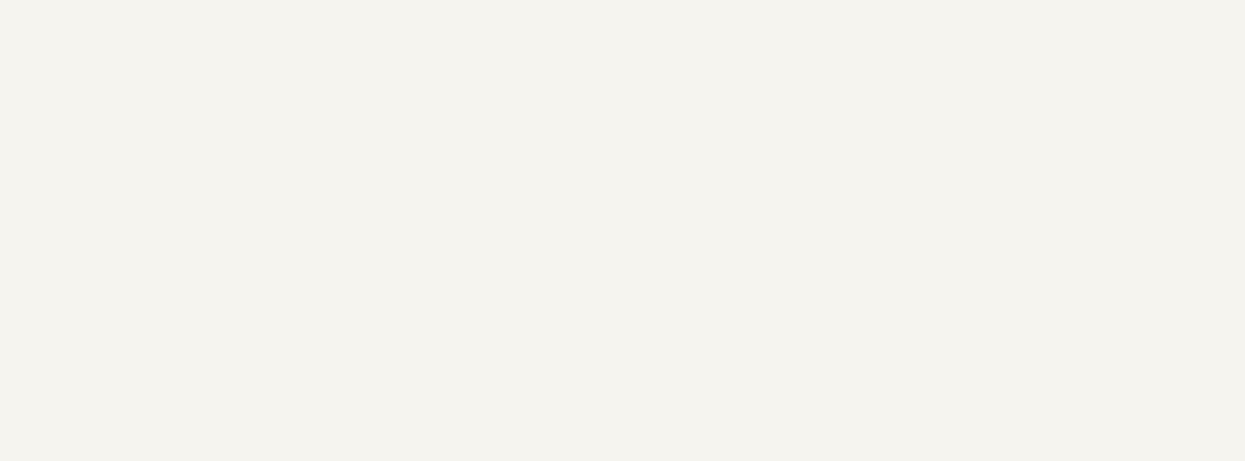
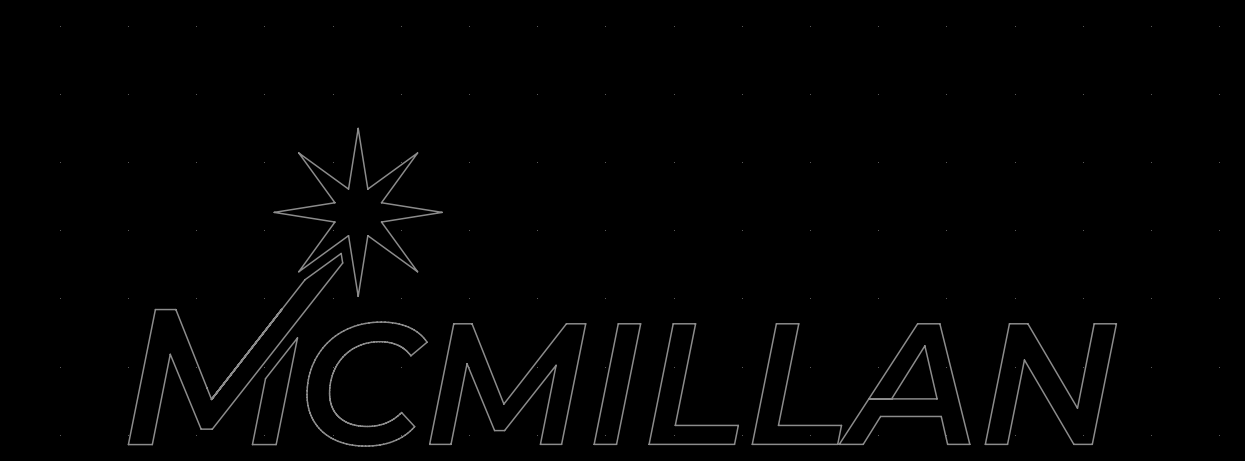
line: none -> (358, 128) (348, 189) (298, 153) (334, 202) (274, 212) (334, 222) (298, 271) (348, 235) (358, 296) (367, 235) (417, 271) (381, 222) (442, 212) (381, 202) (417, 153) (367, 189) (358, 128)
line: none -> (381, 322) (357, 325) (338, 334) (322, 348) (311, 369) (307, 394) (311, 415) (322, 431) (340, 442) (362, 446) (383, 444) (402, 437) (414, 426) (401, 412) (392, 419) (381, 424) (367, 426) (354, 425) (340, 418) (331, 405) (329, 390) (333, 373) (341, 358) (352, 349) (368, 342) (384, 341) (400, 346) (410, 355) (427, 342) (419, 333) (408, 327) (381, 322)
line: none -> (453, 323) (472, 323) (503, 404) (566, 323) (585, 323) (561, 444) (540, 444) (556, 365) (504, 430) (494, 430) (467, 363) (451, 444) (429, 444) (453, 323)
line: none -> (618, 323) (640, 323) (616, 444) (594, 444) (618, 323)
line: none -> (673, 323) (695, 323) (675, 425) (738, 425) (734, 444) (649, 444) (673, 323)
line: none -> (776, 323) (798, 323) (778, 425) (841, 425) (837, 444) (752, 444) (776, 323)
line: none -> (1009, 323) (1027, 323) (1077, 408) (1094, 323) (1116, 323) (1092, 444) (1073, 444) (1024, 359) (1007, 444) (985, 444) (1009, 323)
line: none -> (297, 337) (265, 378) (252, 444) (276, 444) (297, 337)
line: none -> (868, 398) (839, 444) (863, 444) (880, 416) (941, 416) (947, 444) (969, 444) (939, 323) (917, 323) (868, 398)
line: none -> (868, 398) (937, 398) (924, 345) (891, 398)
line: none -> (211, 399) (305, 279) (341, 253) (342, 263) (212, 429) (201, 429) (170, 354) (152, 444) (128, 444) (155, 309) (175, 309) (211, 399)

